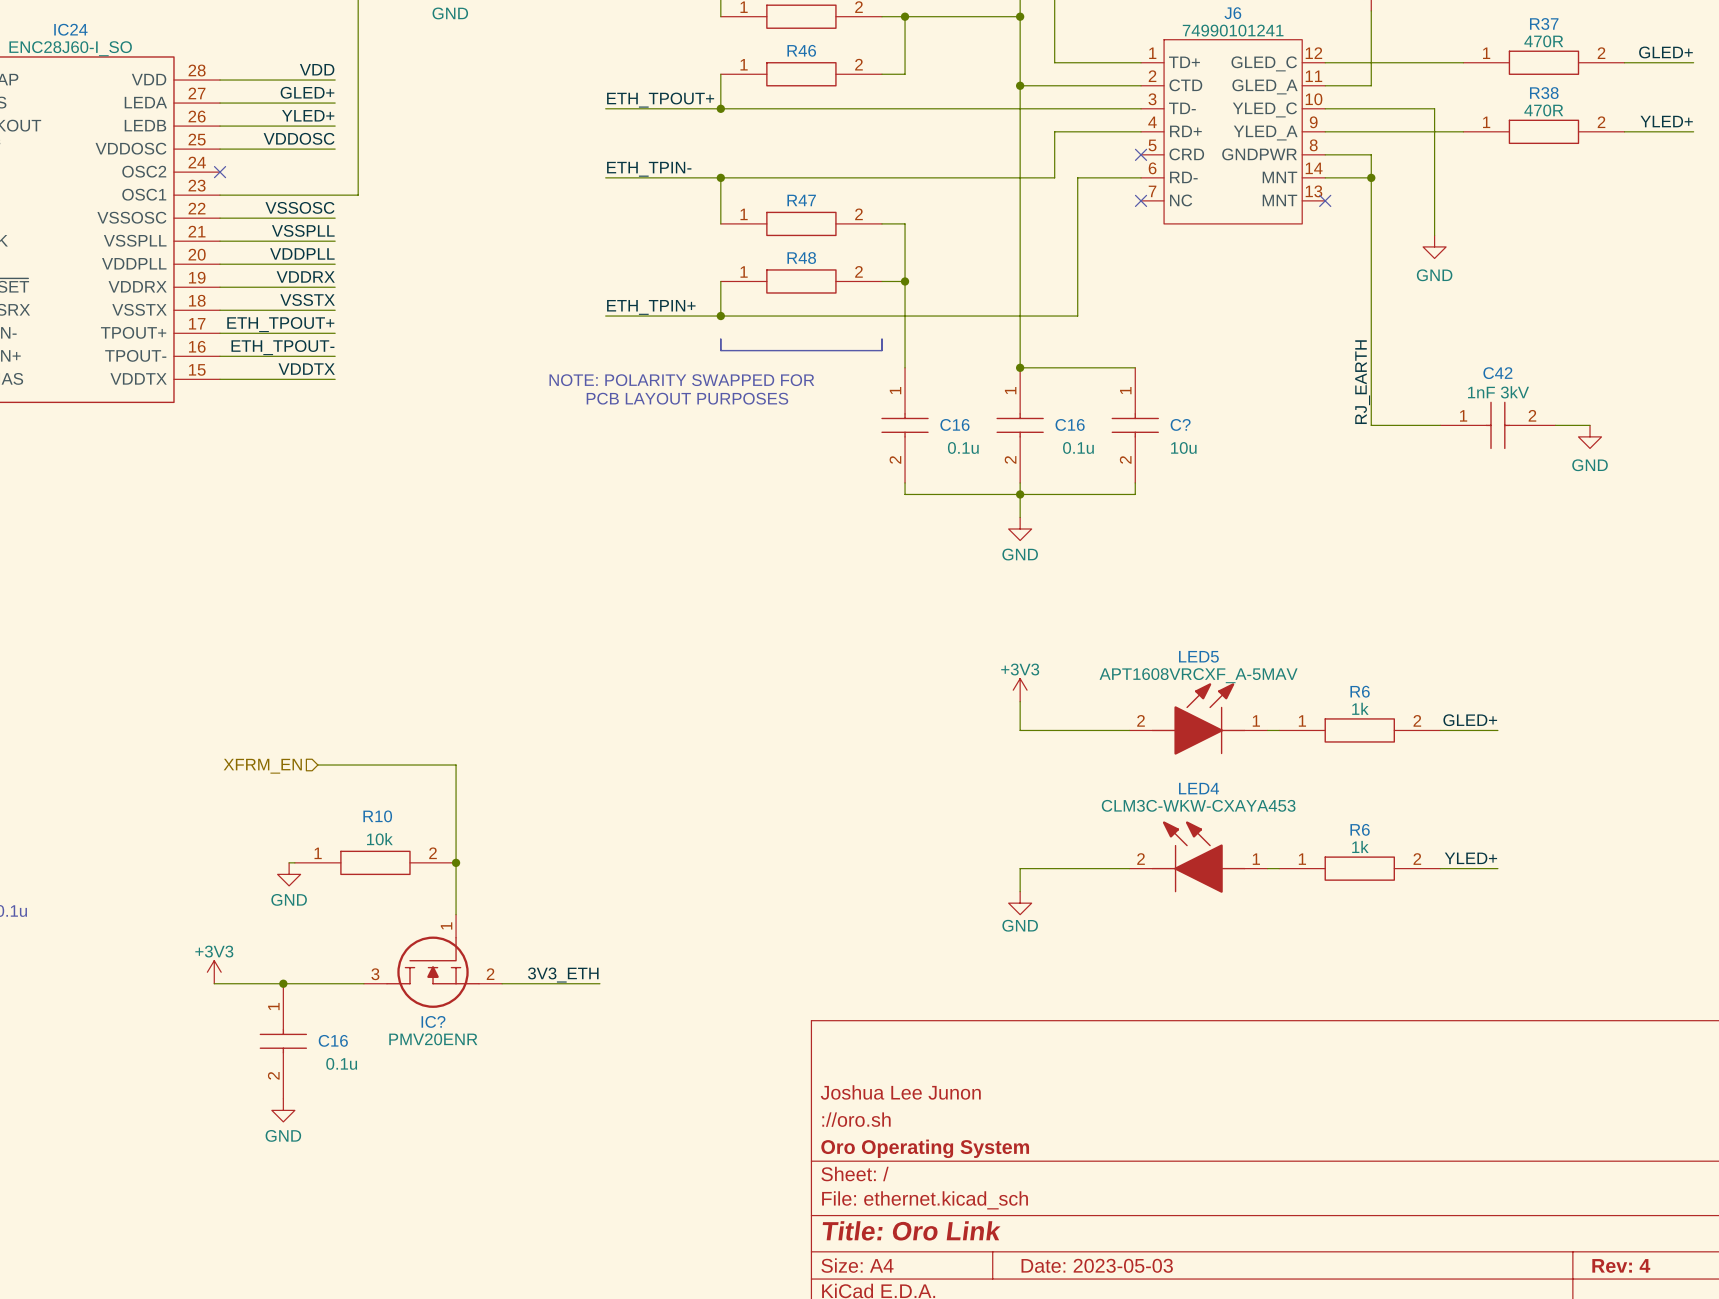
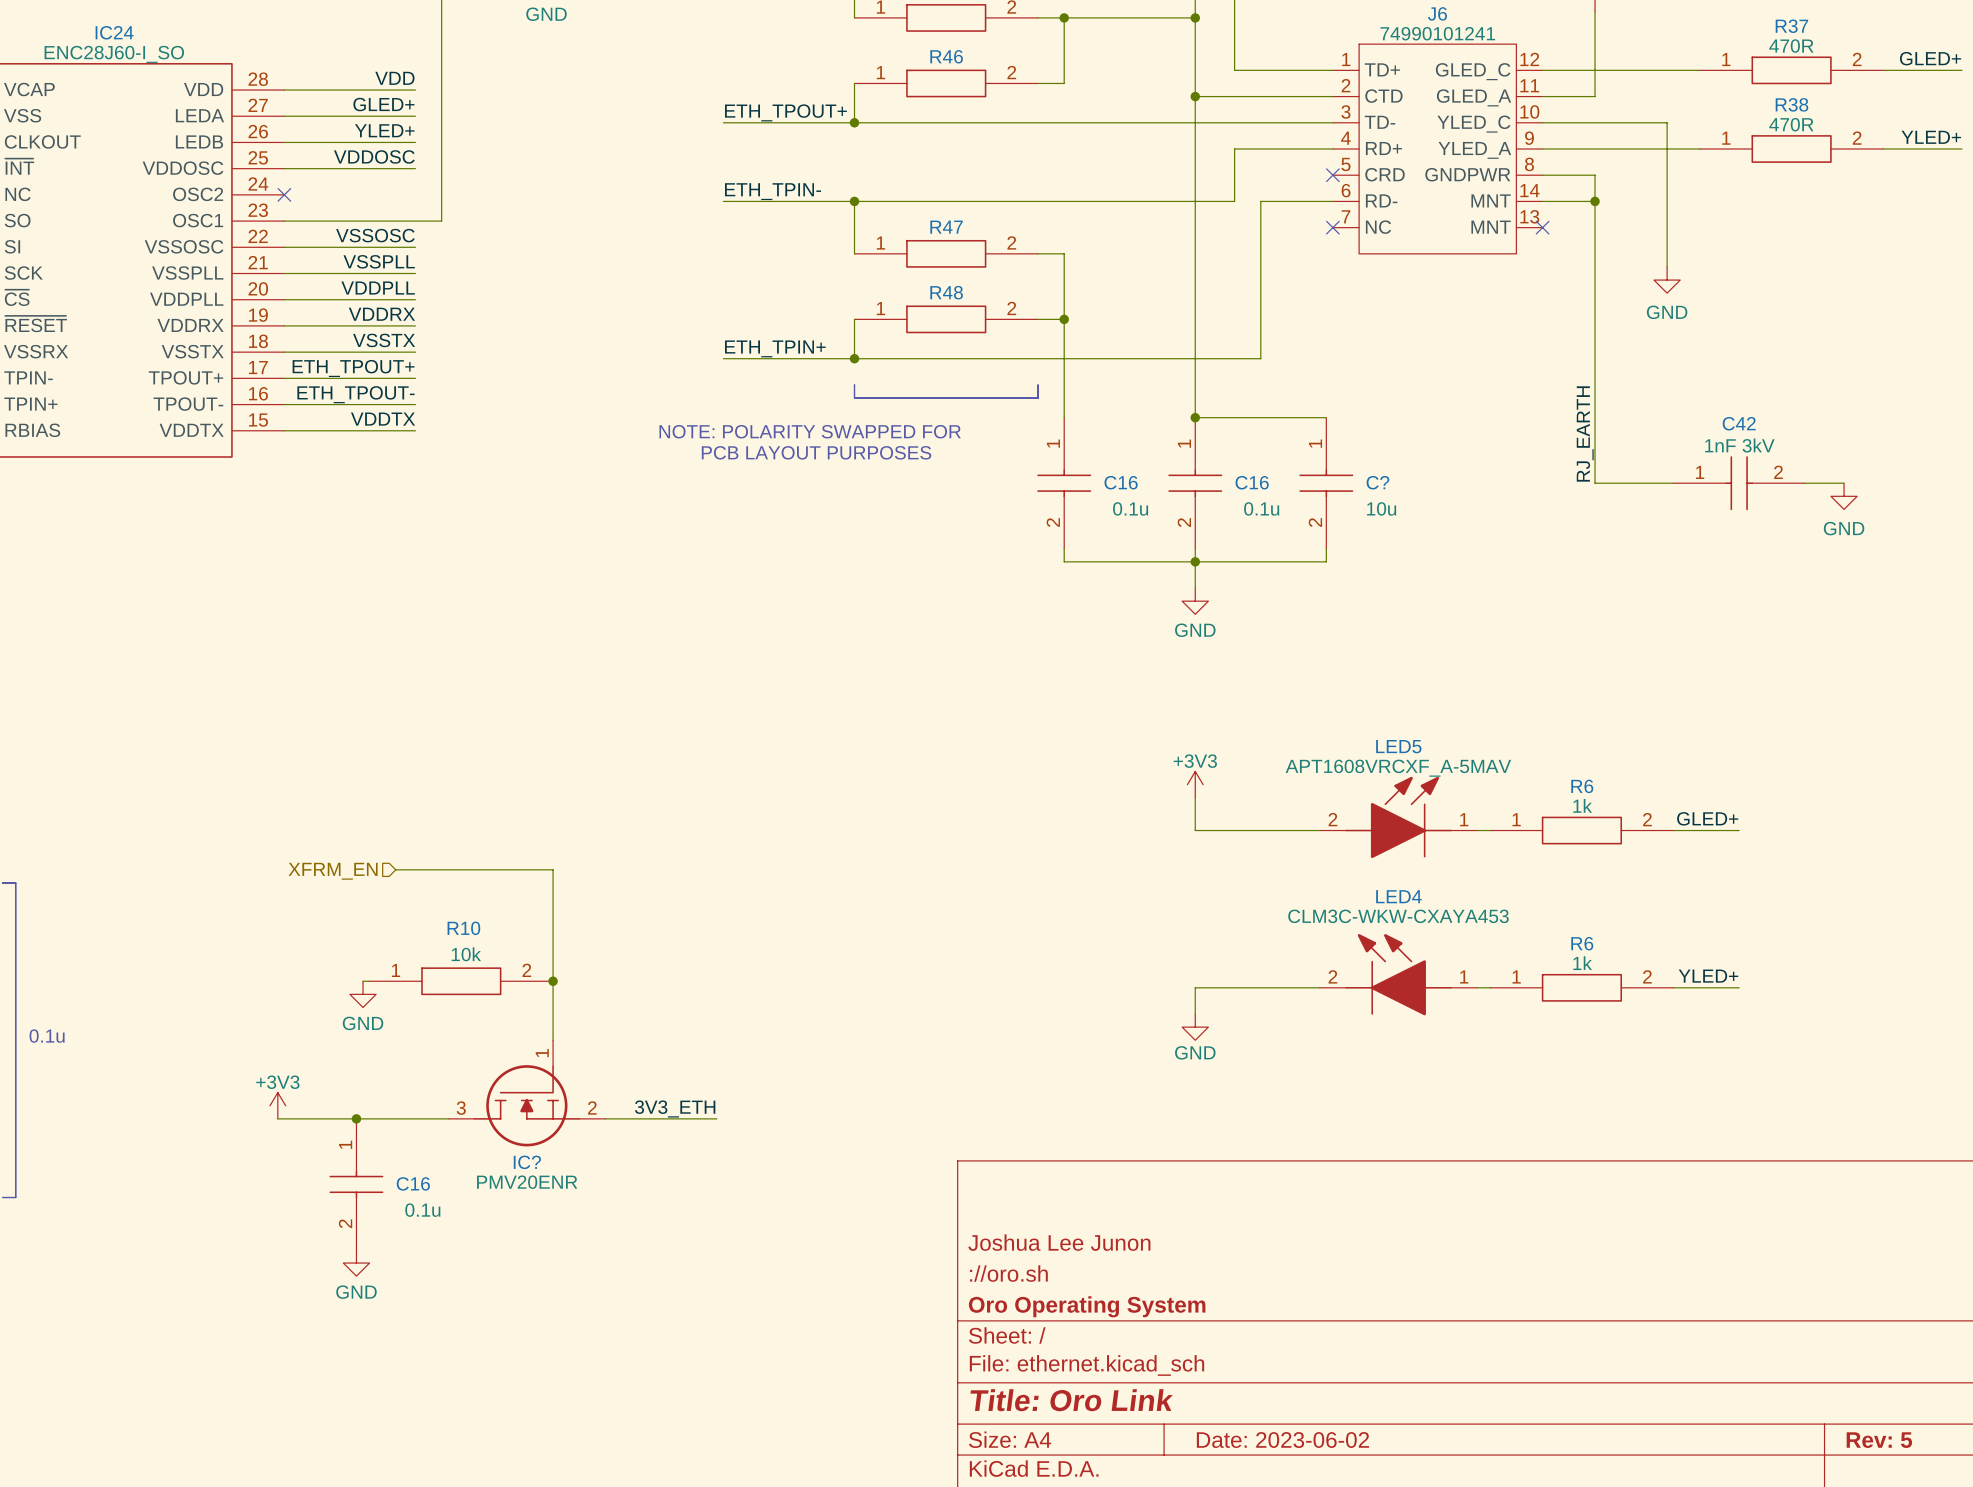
title block: Date: 2023-05-03 (1097, 1265) -> Date: 2023-06-02 (1282, 1440)
title block: Rev: 4 (1621, 1265) -> Rev: 5 (1879, 1440)

